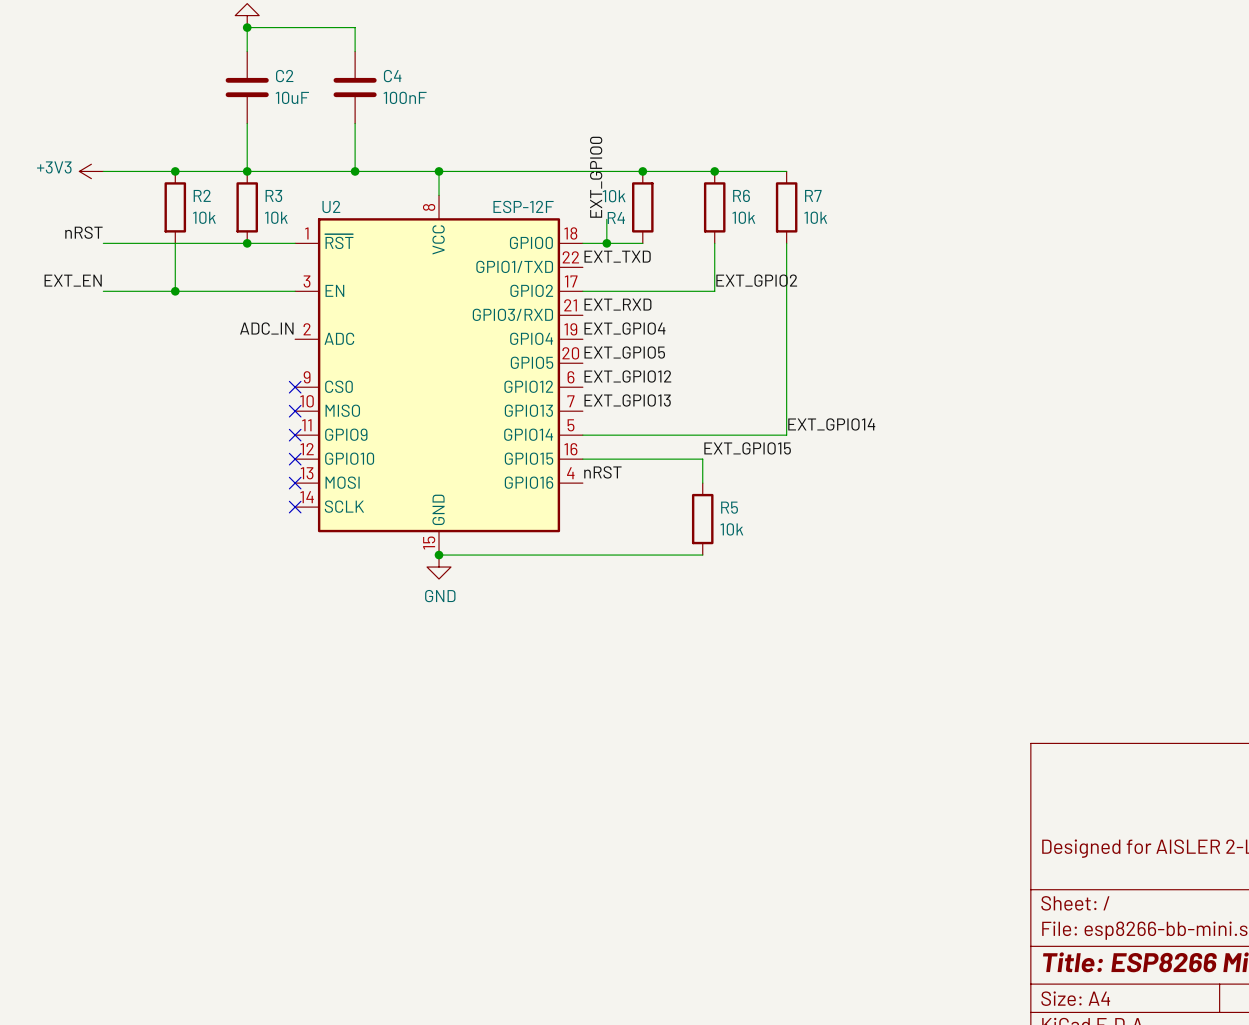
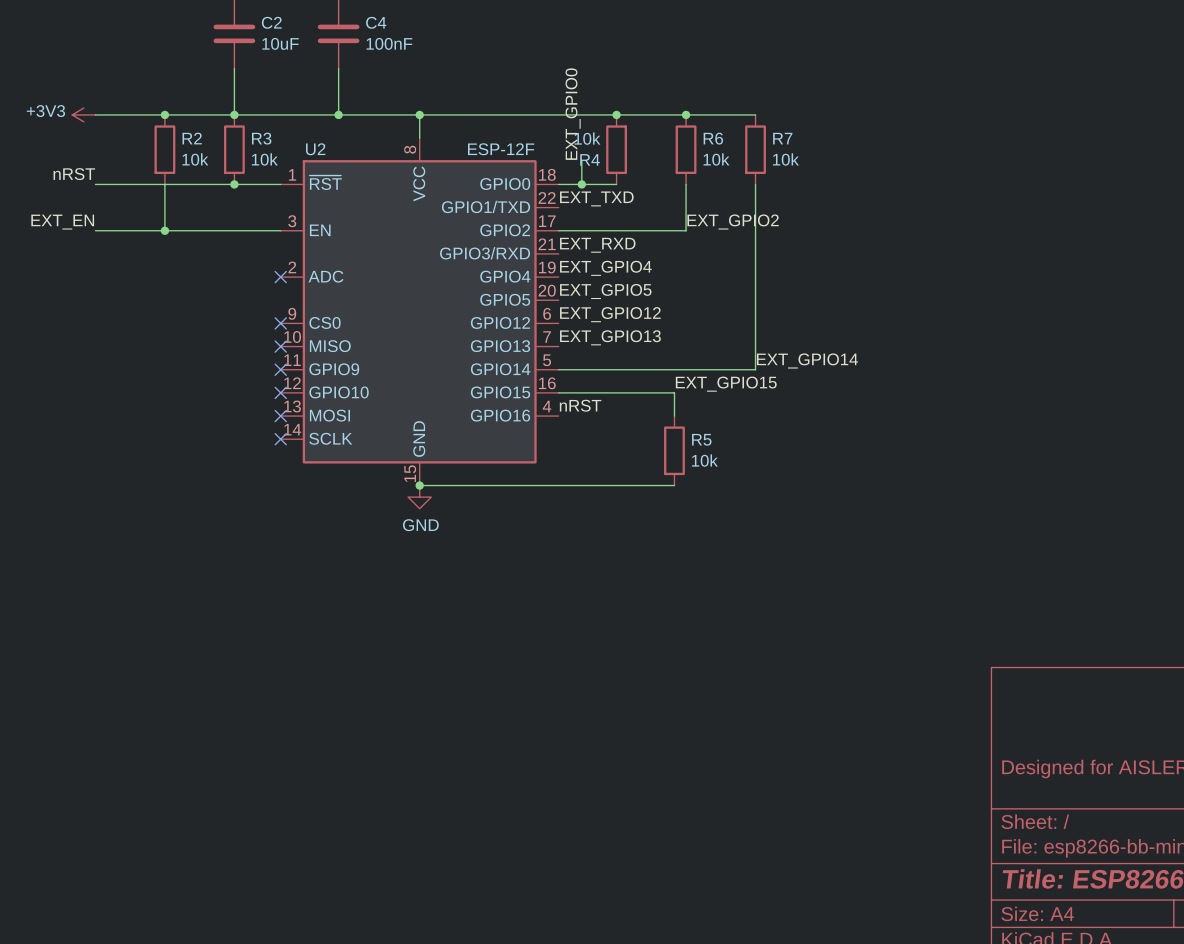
label: ADC_IN (266, 328) -> none
no-connect mark: none -> (280, 277)

